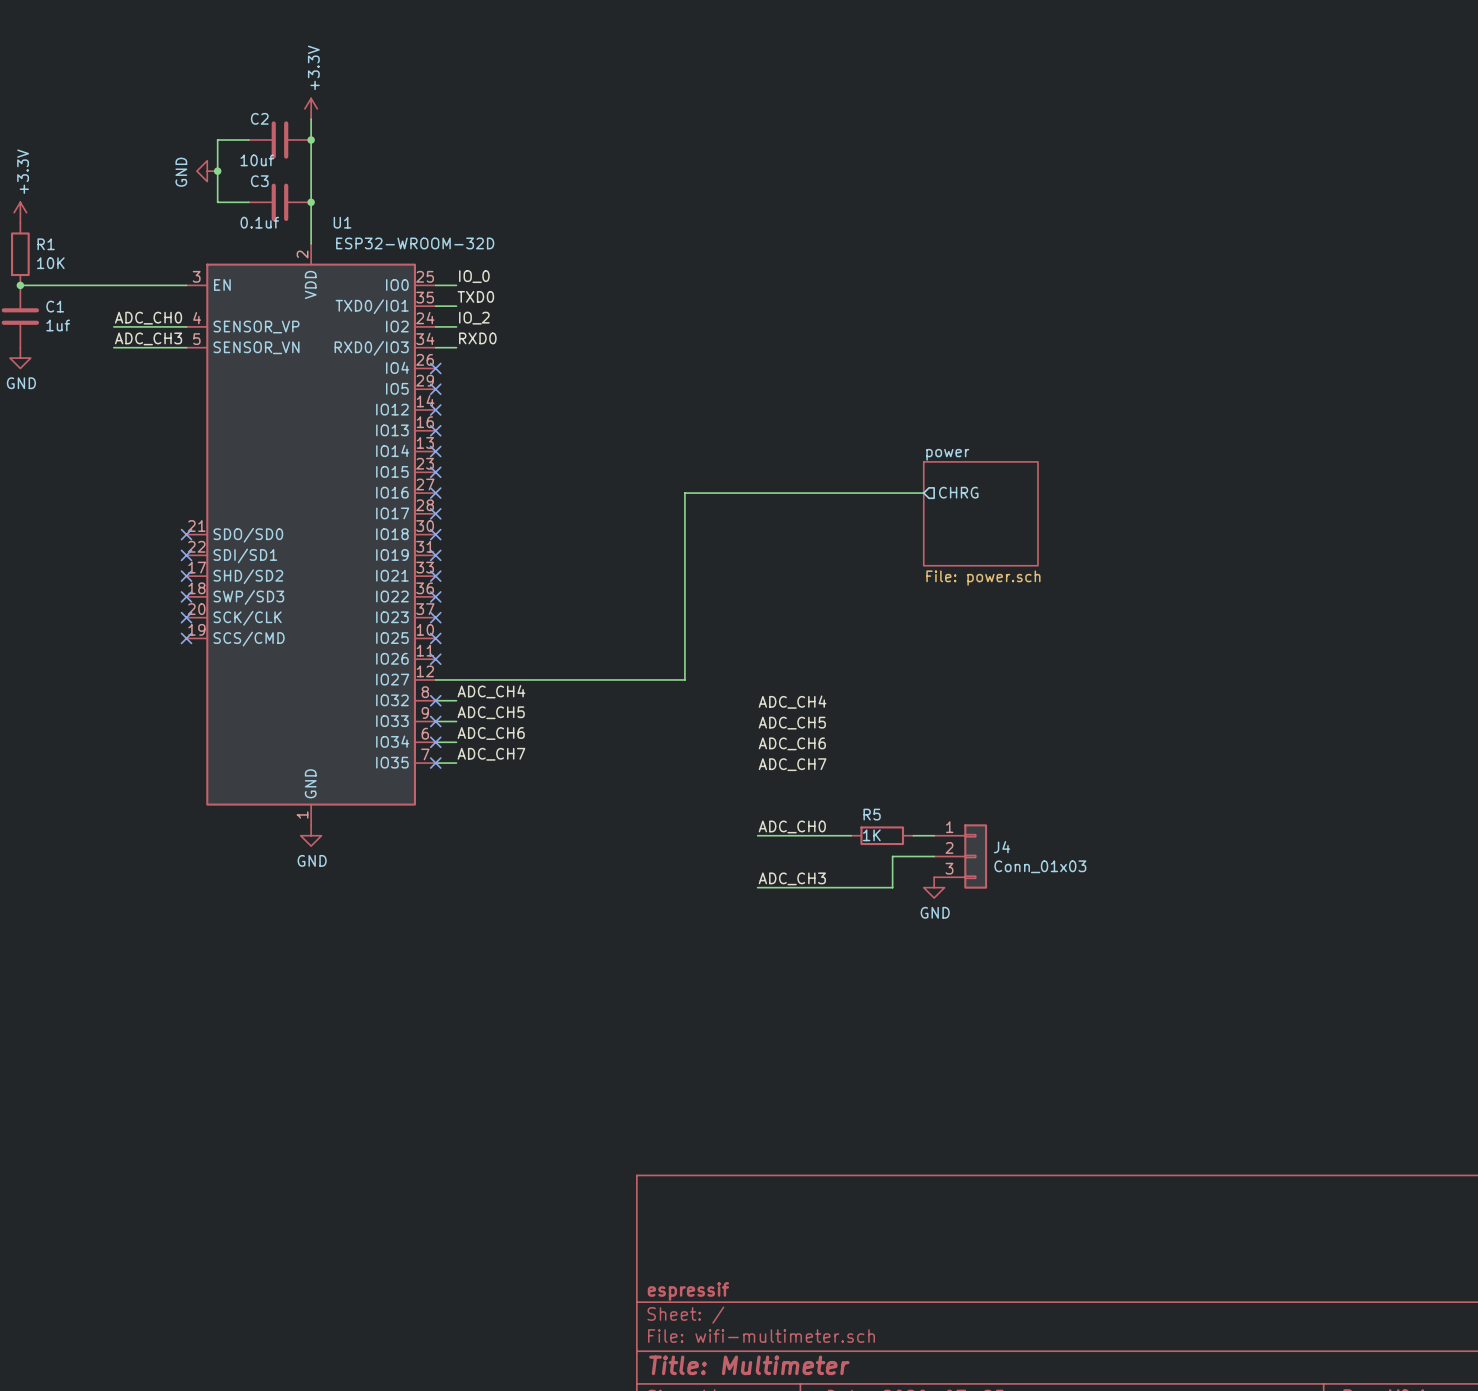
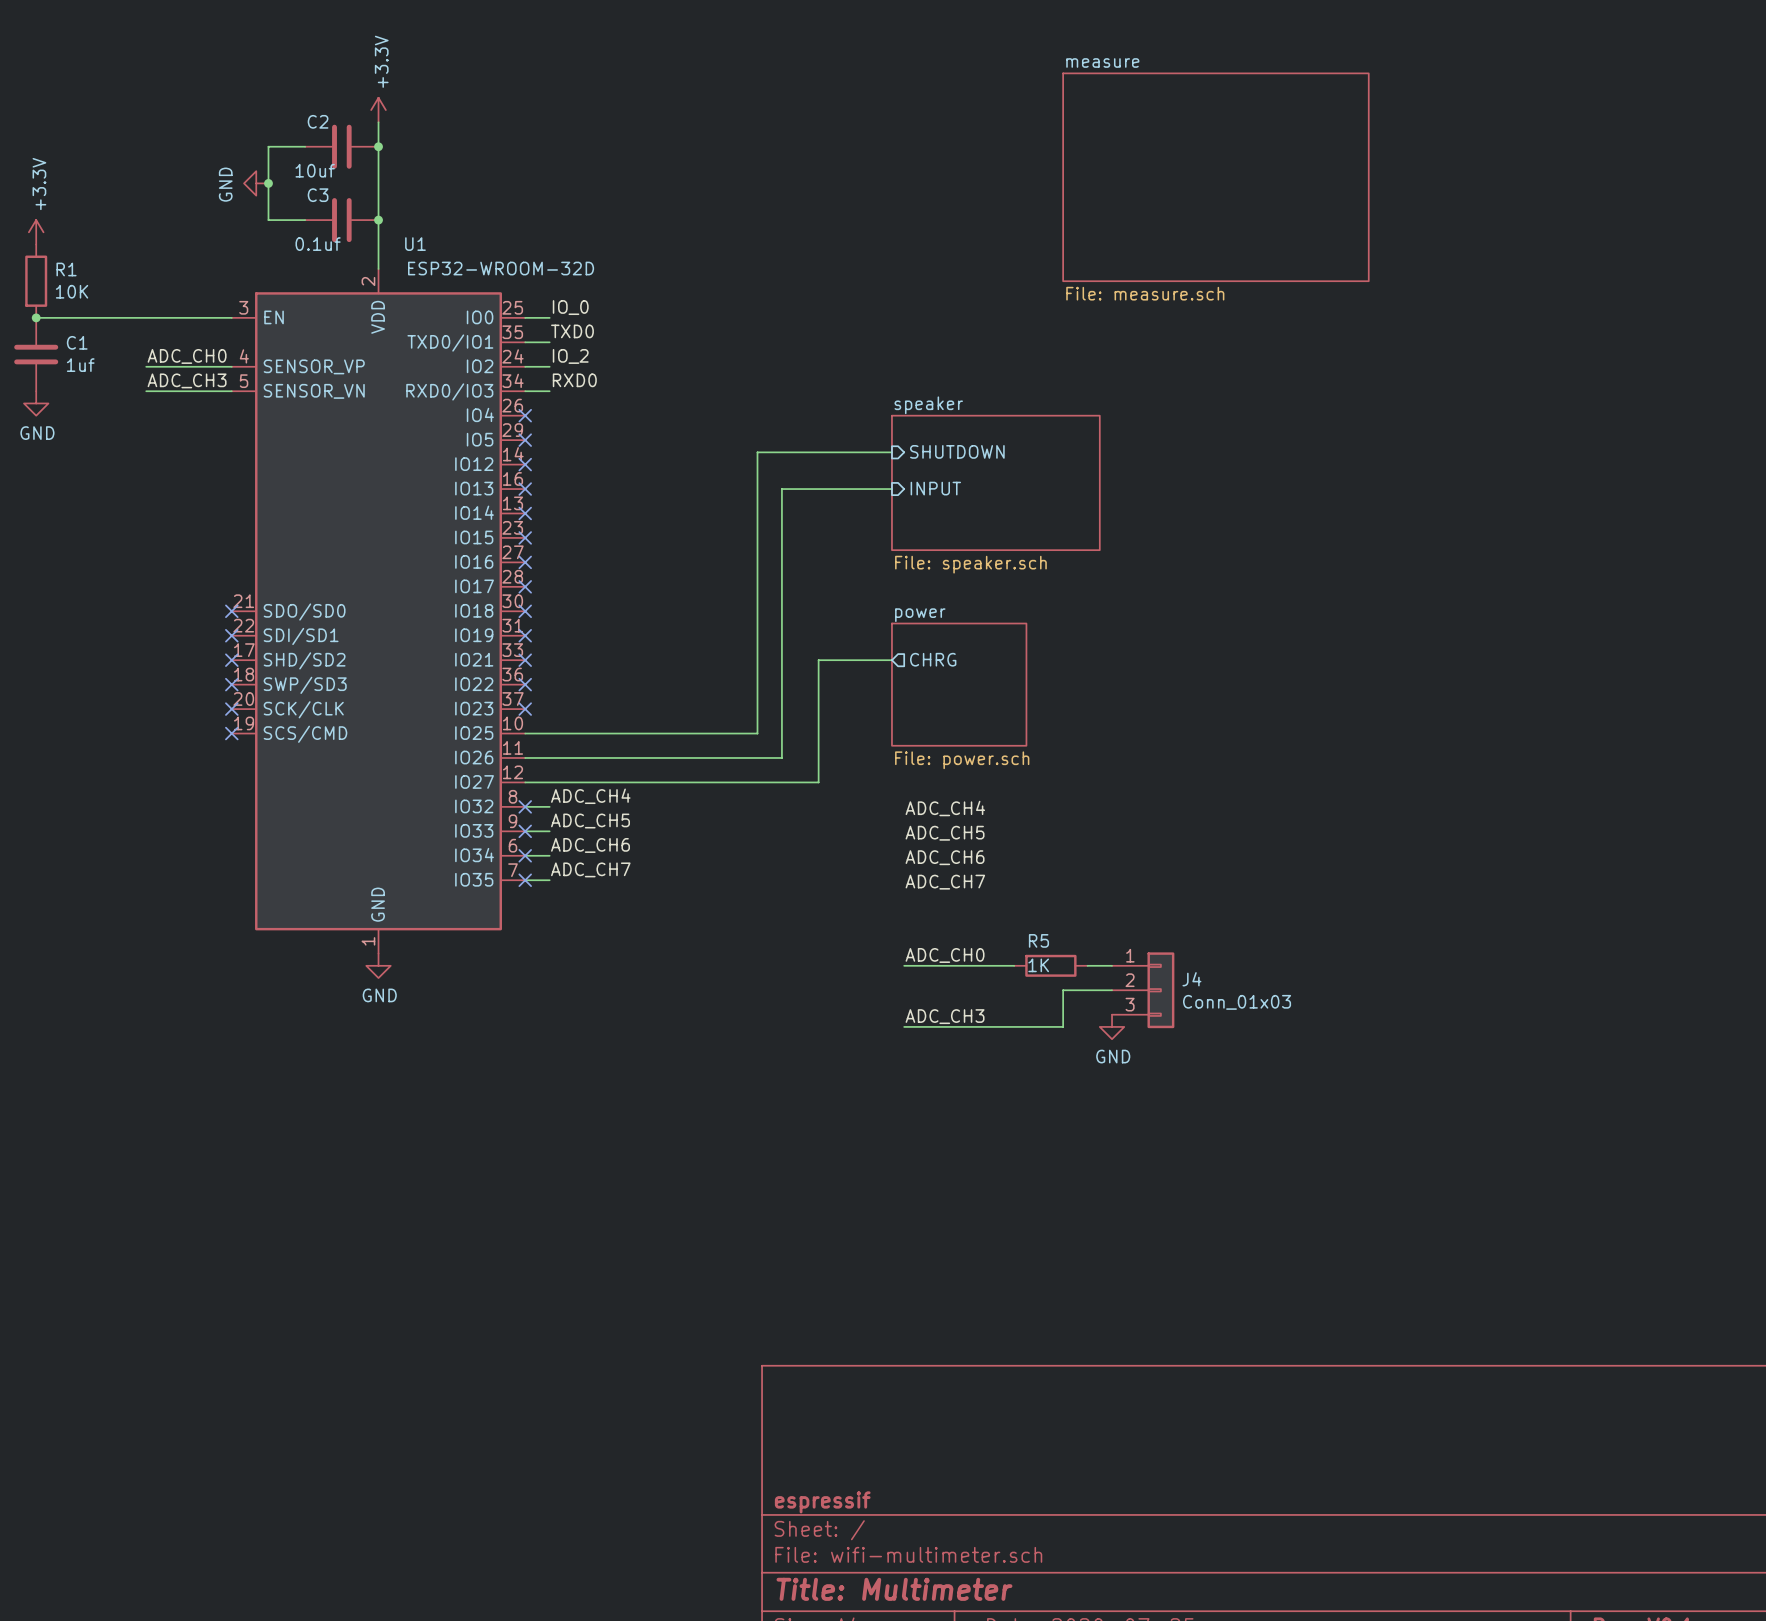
sheet measure: none -> File: measure.sch (1215, 177)
wire: none -> (891, 452) (757, 452) (757, 733) (525, 733)
sheet pin: none -> SHUTDOWN (957, 451)
sheet speaker: none -> File: speaker.sch (995, 482)
wire: none -> (891, 489) (781, 489) (781, 757) (525, 757)
sheet pin: none -> INPUT (935, 488)
sheet pin position: CHRG (958, 492) -> CHRG (933, 659)
wire: (923, 493) (684, 493) (684, 576) -> (891, 660) (818, 660)
sheet power position: (980, 513) -> (959, 684)
no-connect mark: (435, 638) -> none
no-connect mark: (435, 659) -> none

